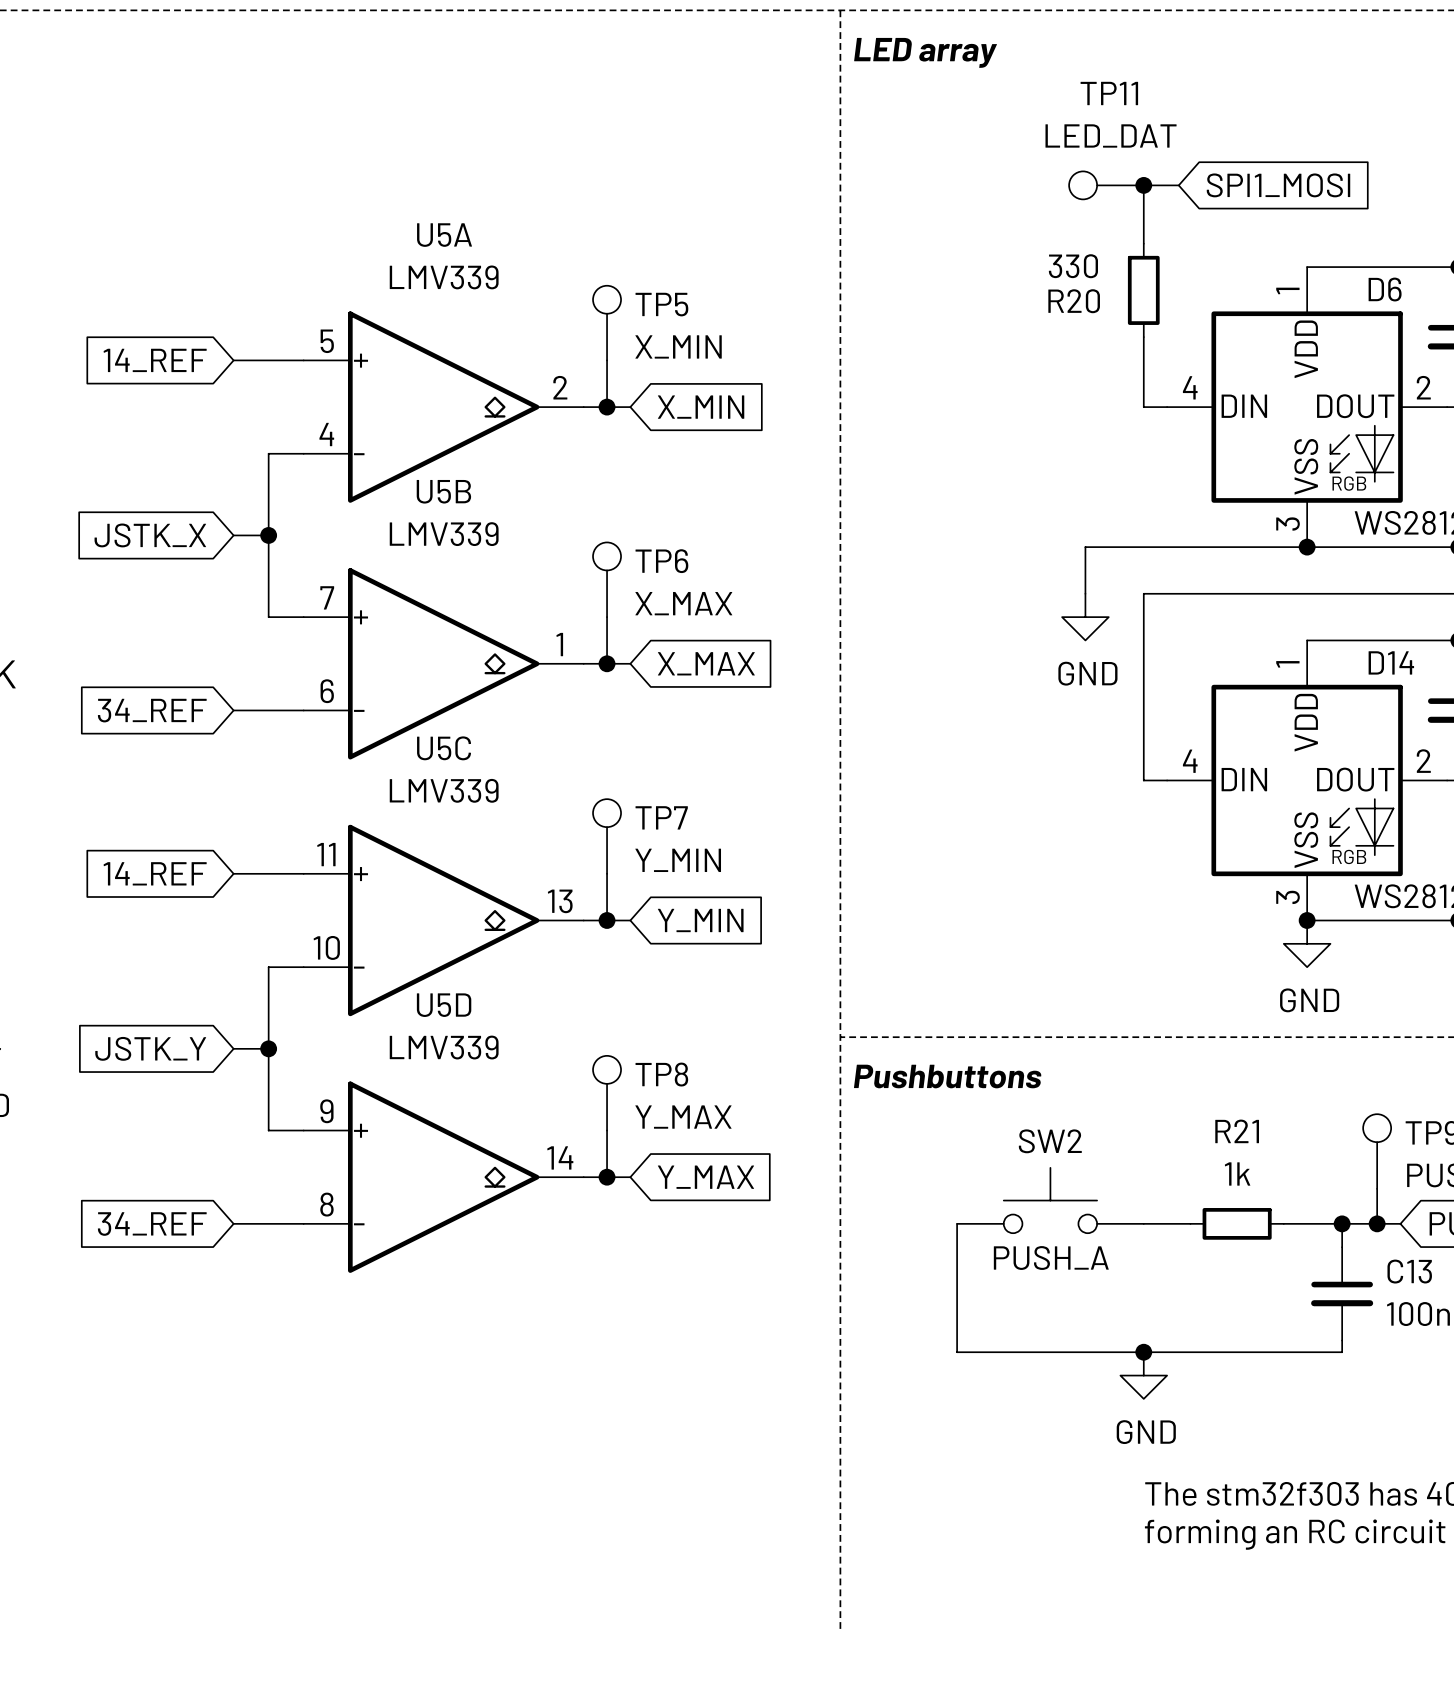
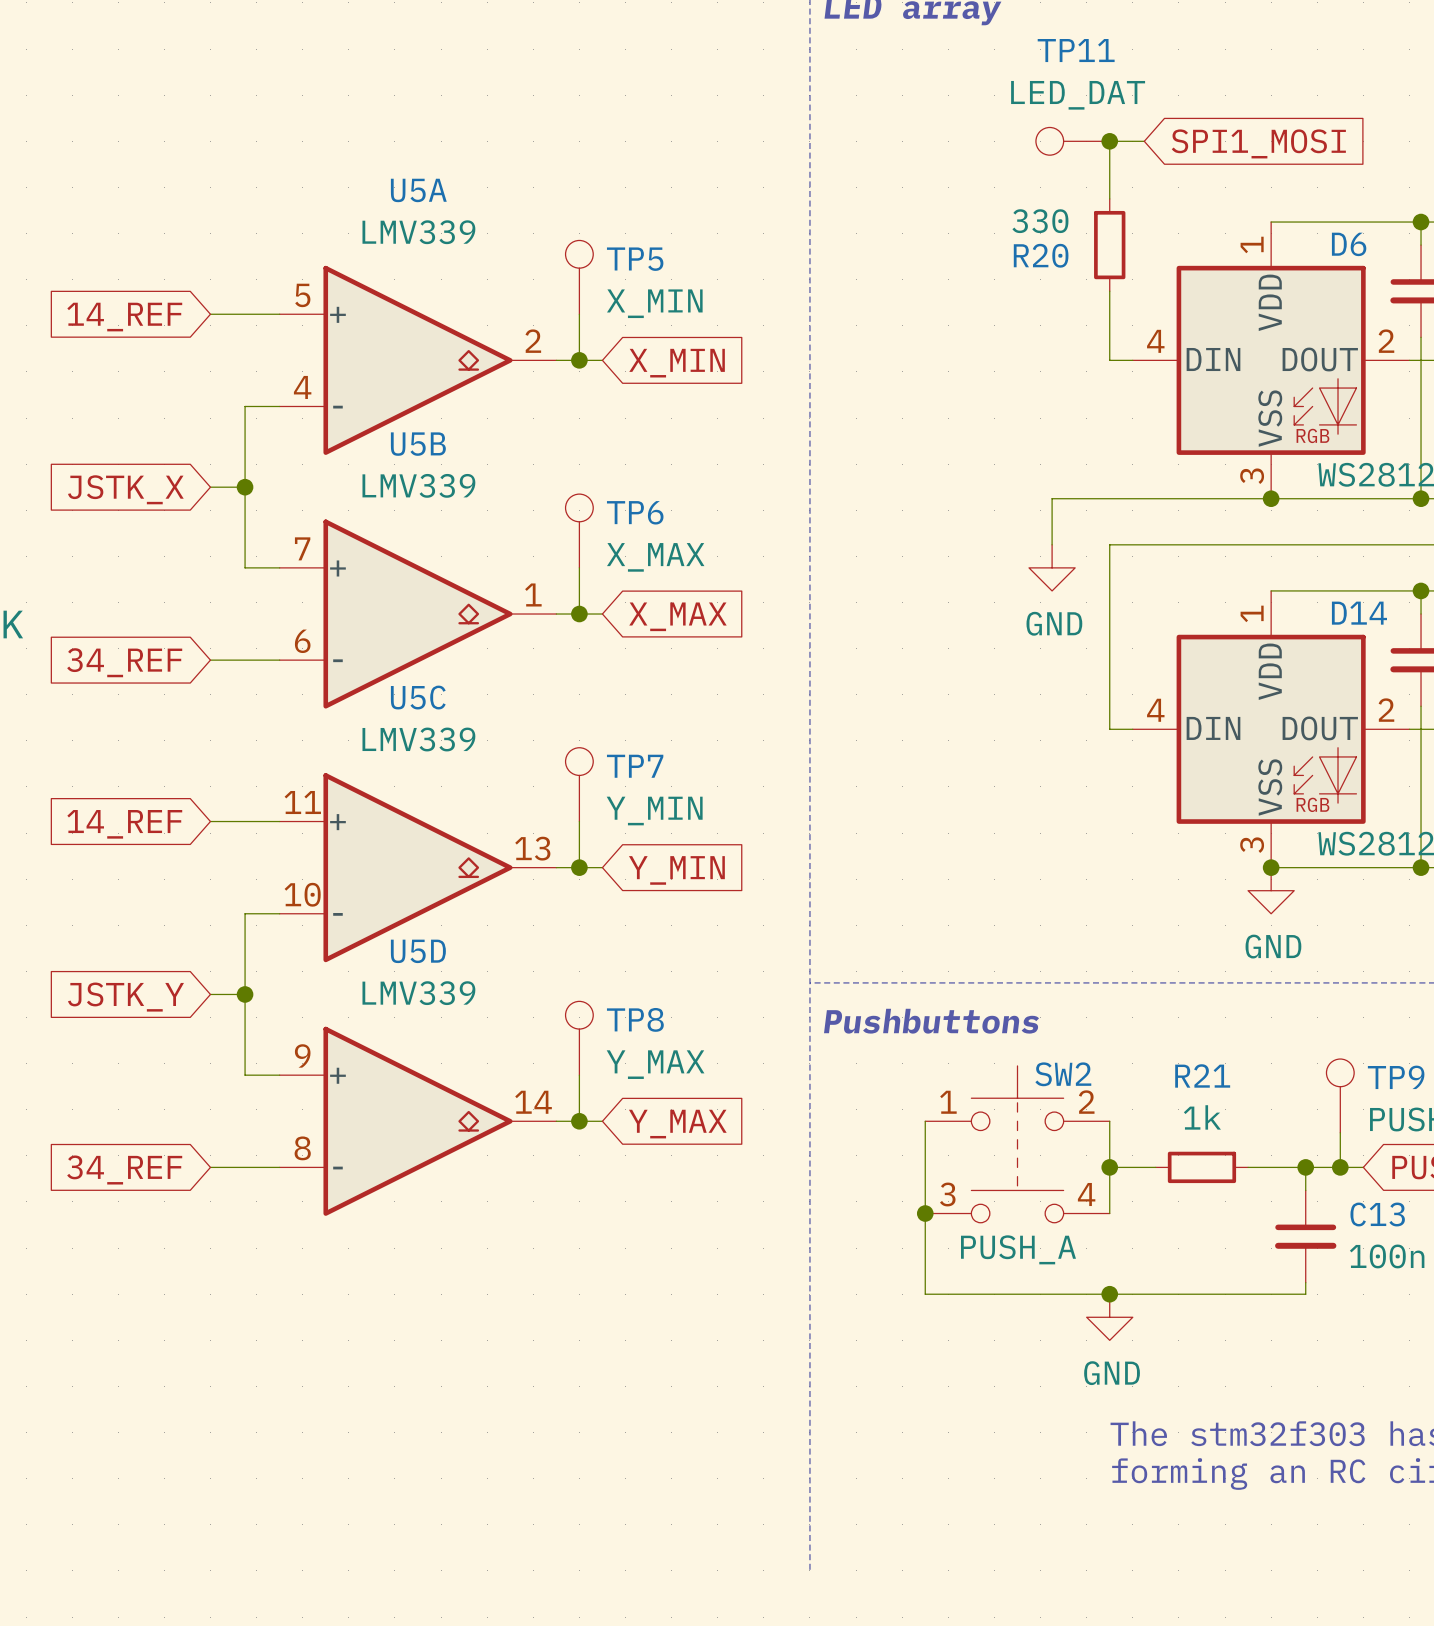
SW2 name position: SW2 (1050, 1141) -> SW2 (1063, 1074)
SW2 symbol: [957, 1167, 1144, 1234] -> [925, 1065, 1110, 1223]
wire: none -> (925, 1121) (925, 1167)
wire: none -> (1109, 1121) (1109, 1213)
junction: none -> (1109, 1167)
SW2 value position: PUSH_A (1051, 1258) -> PUSH_A (1018, 1249)
junction: none -> (925, 1213)

